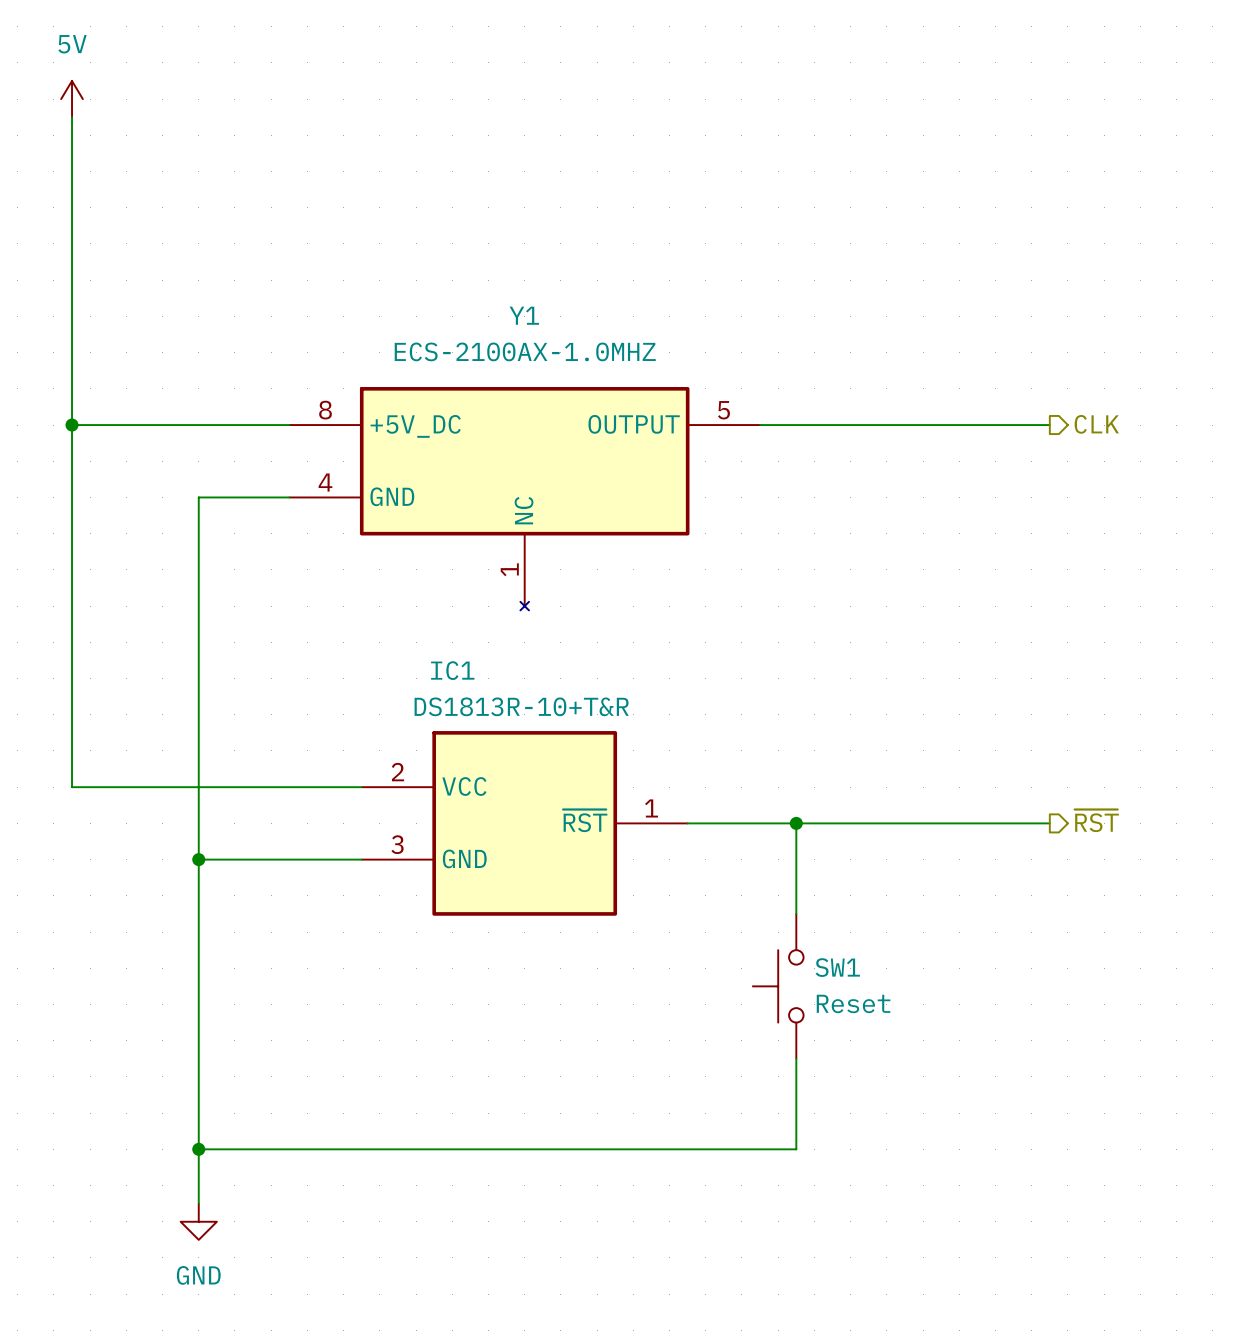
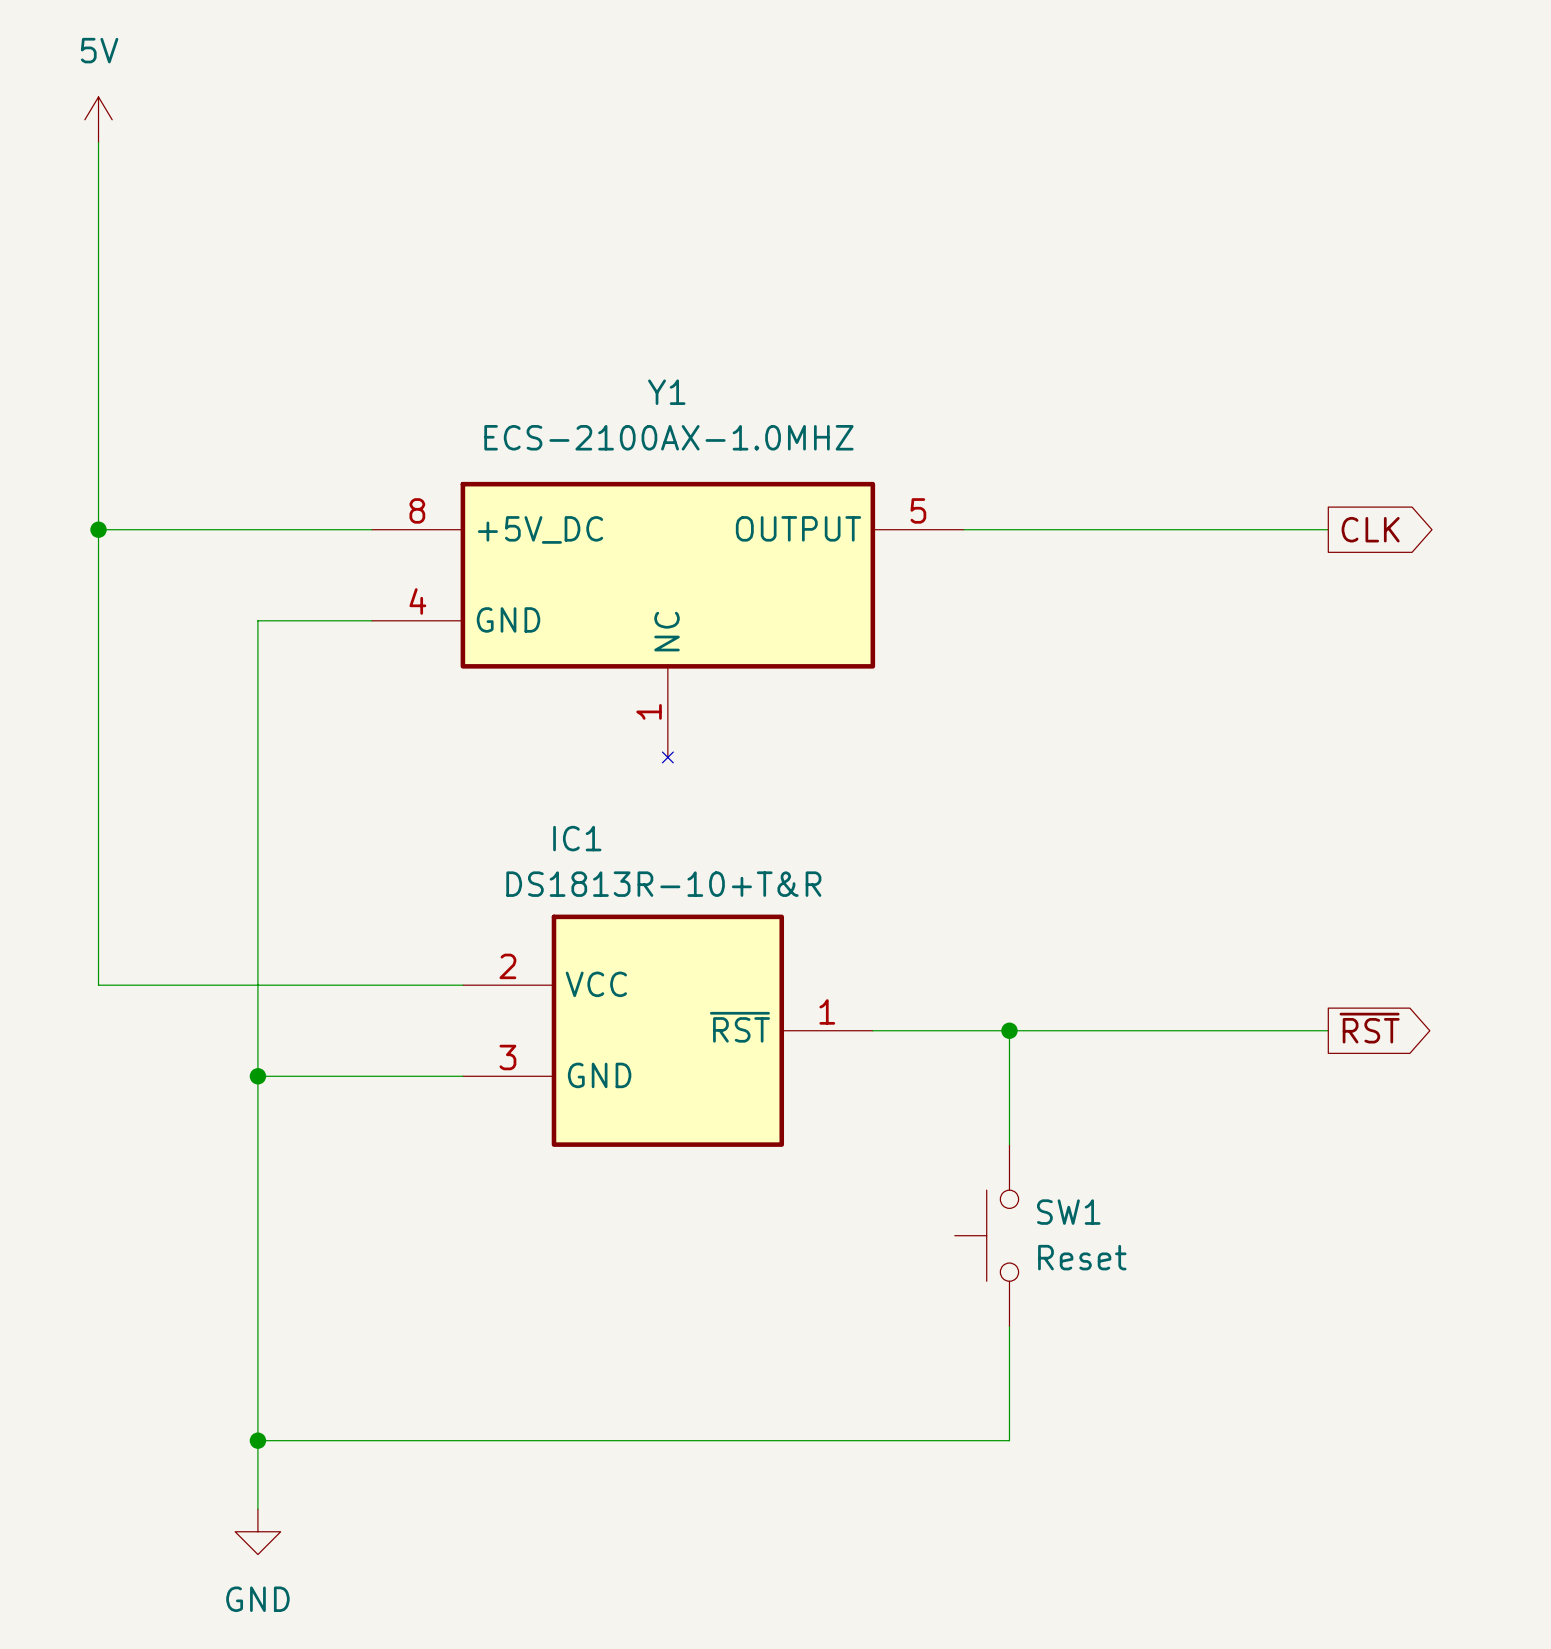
hierarchical label: CLK (1096, 424) -> none
global label: none -> CLK (1370, 529)
hierarchical label: ~{RST} (1096, 820) -> none
global label: none -> ~{RST} (1369, 1028)

